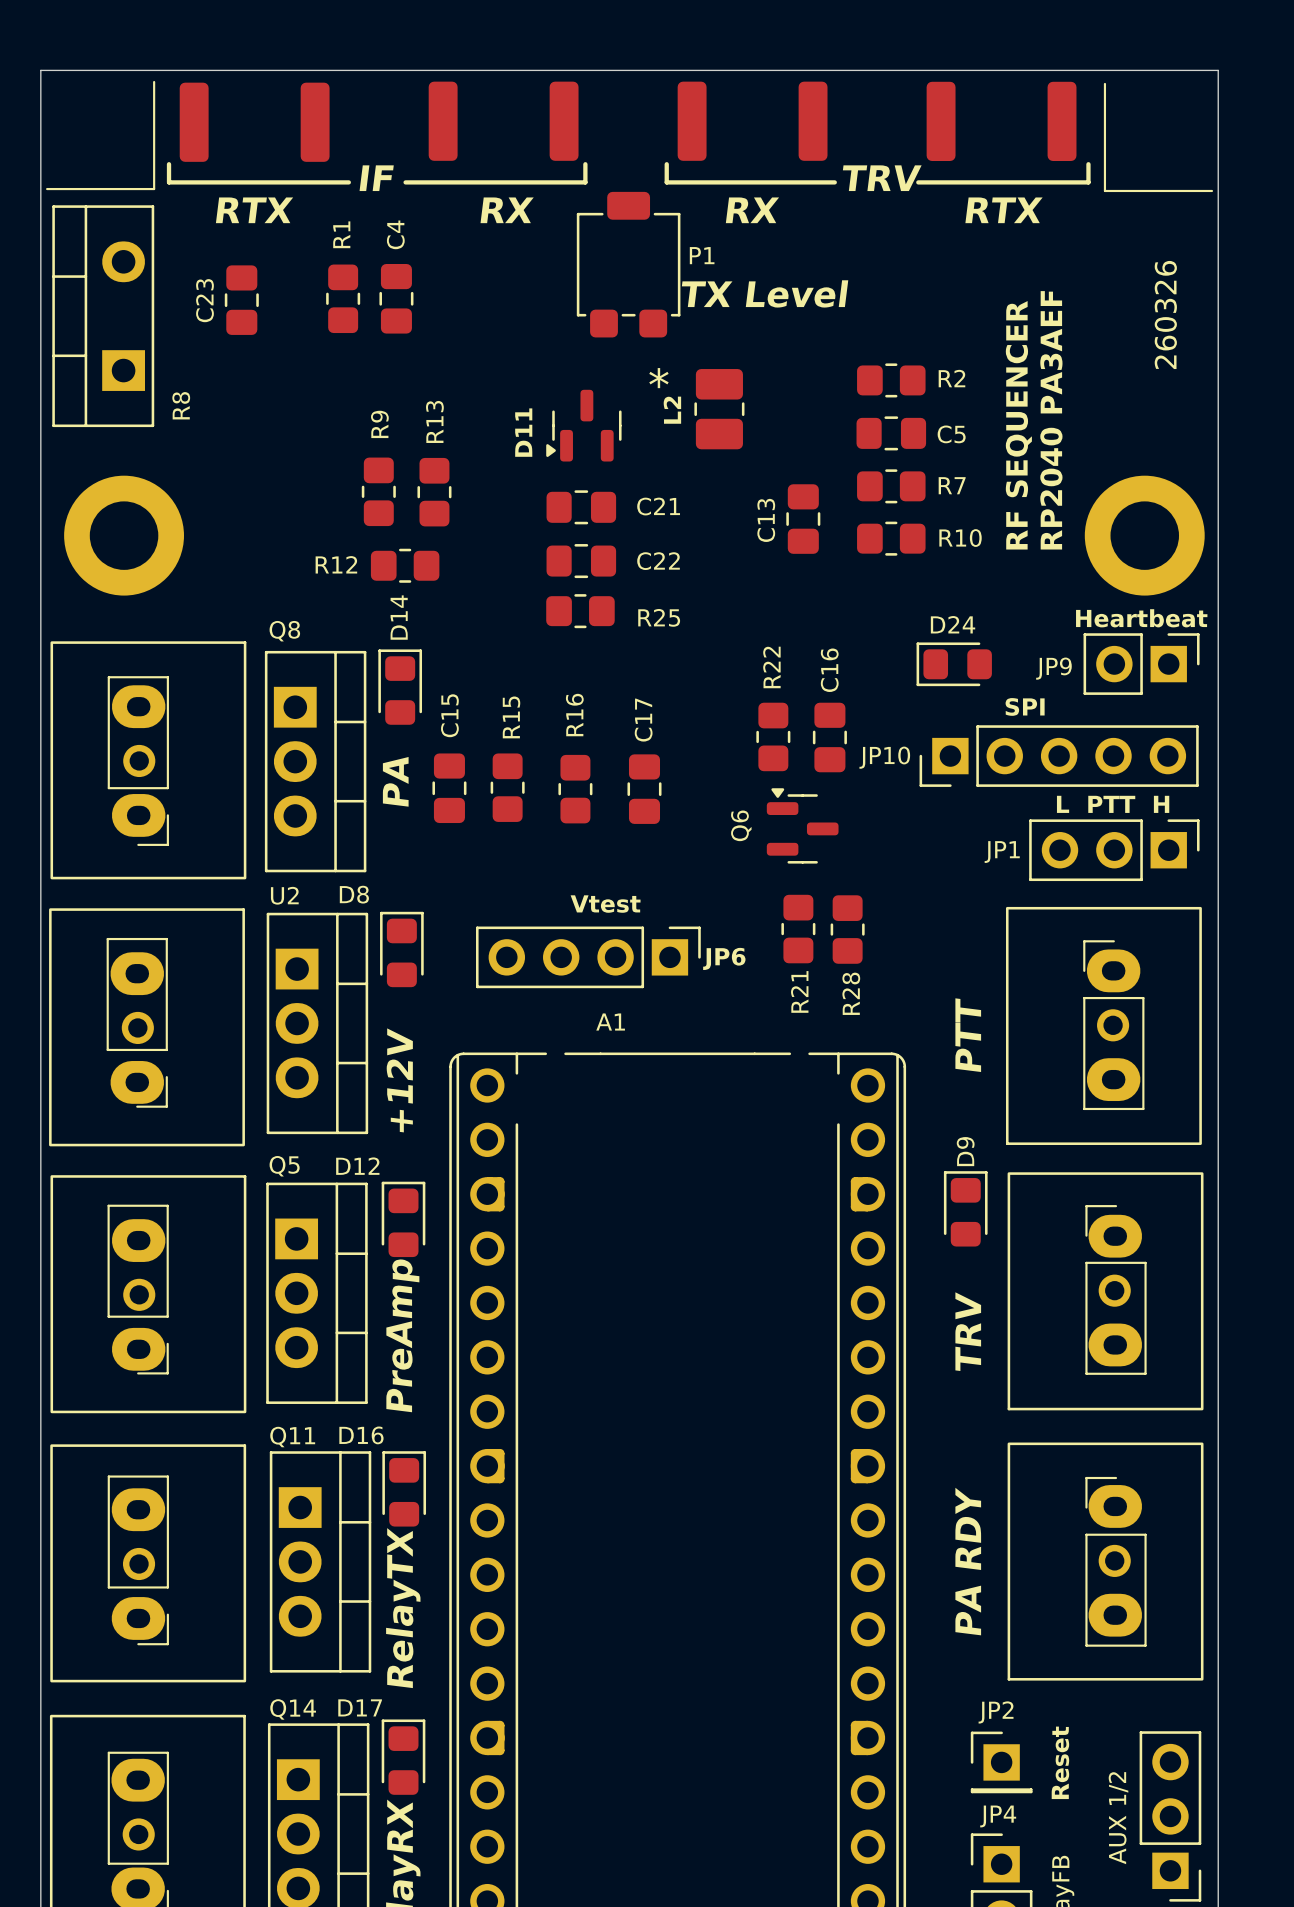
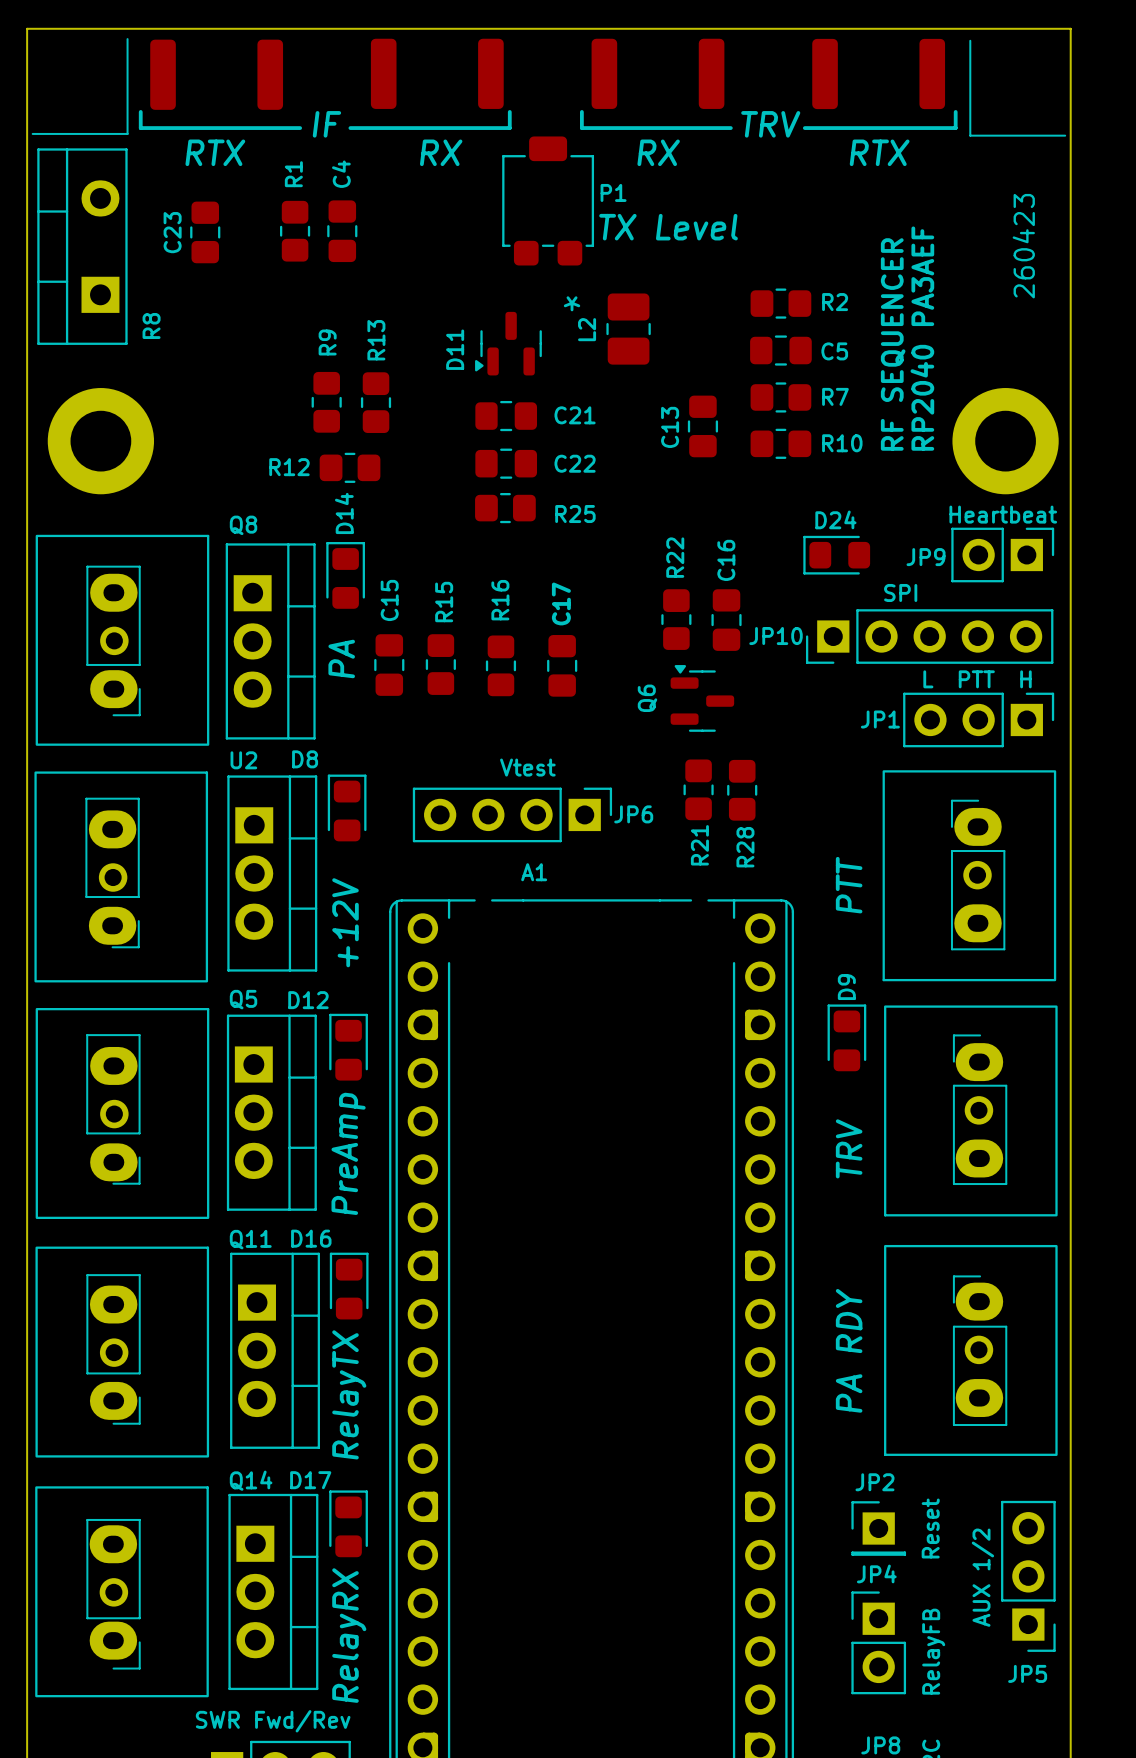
text: 260326 (1165, 314) -> 260423 (1023, 246)

